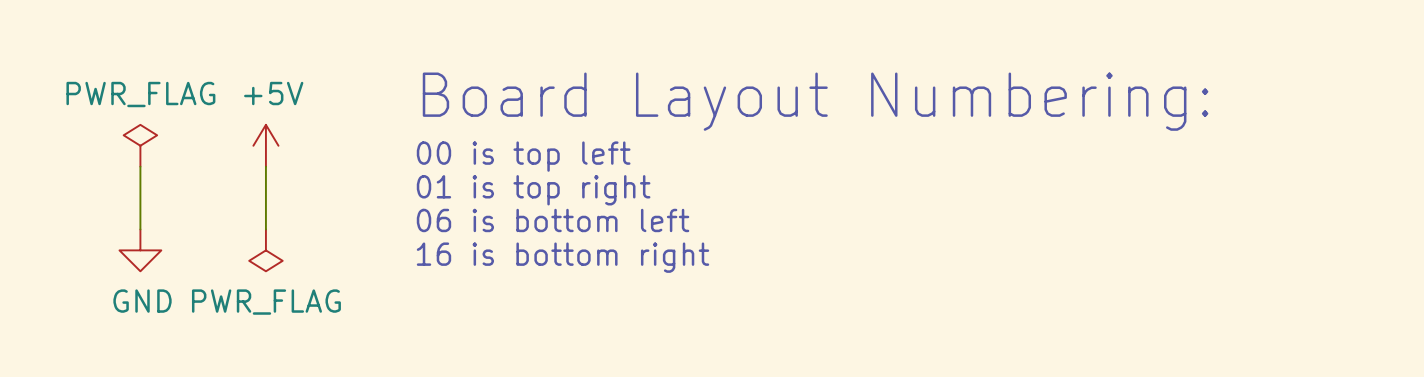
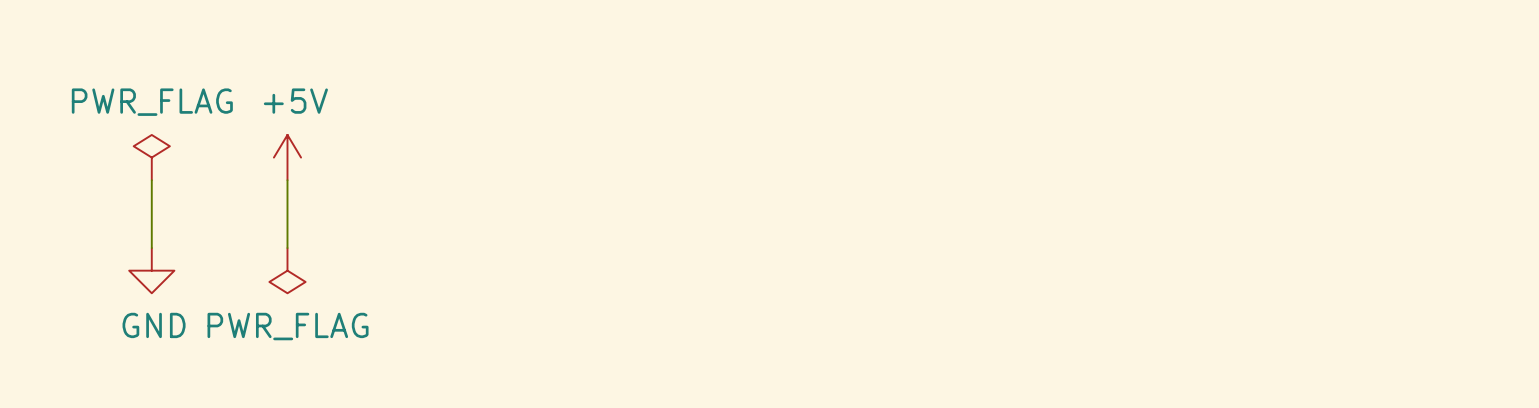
text: Board Layout Numbering: (815, 101) -> none
text: 00 is top left (523, 156) -> none
text: 01 is top right (533, 190) -> none
text: 06 is bottom left (553, 220) -> none
text: 16 is bottom right (563, 257) -> none

